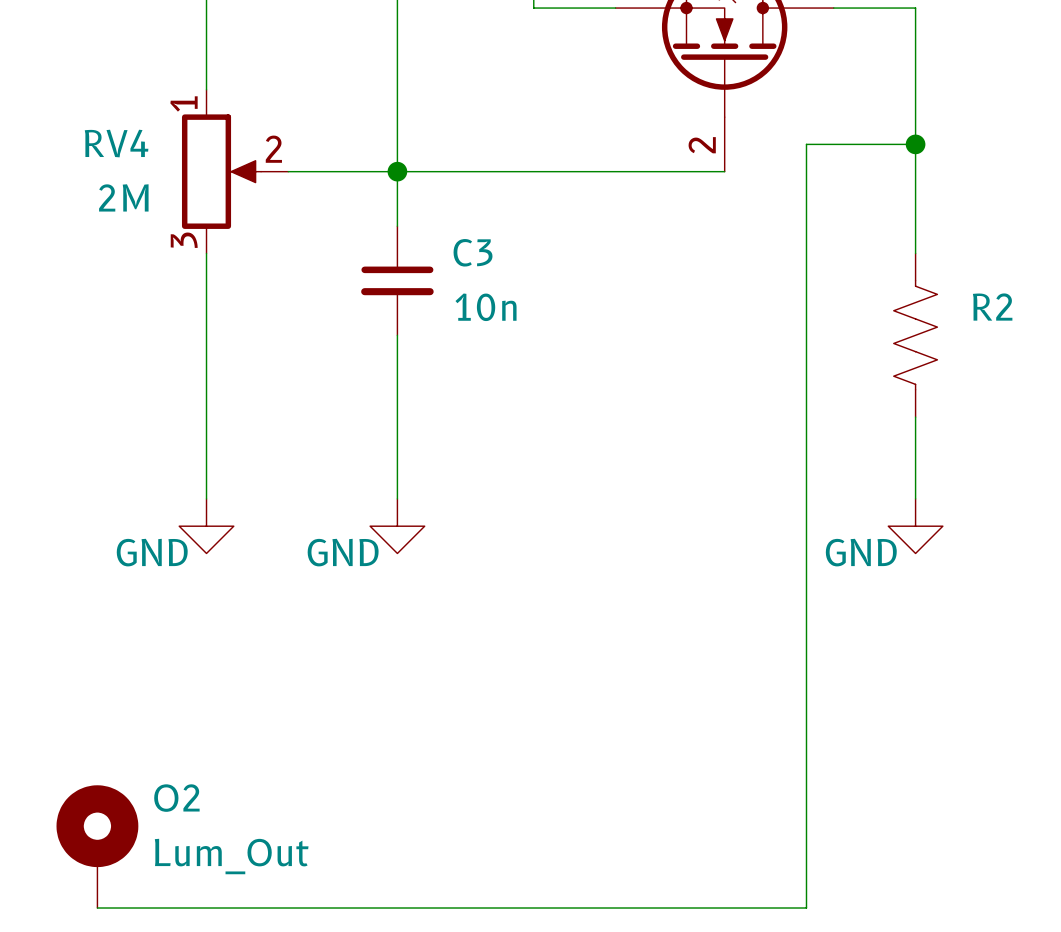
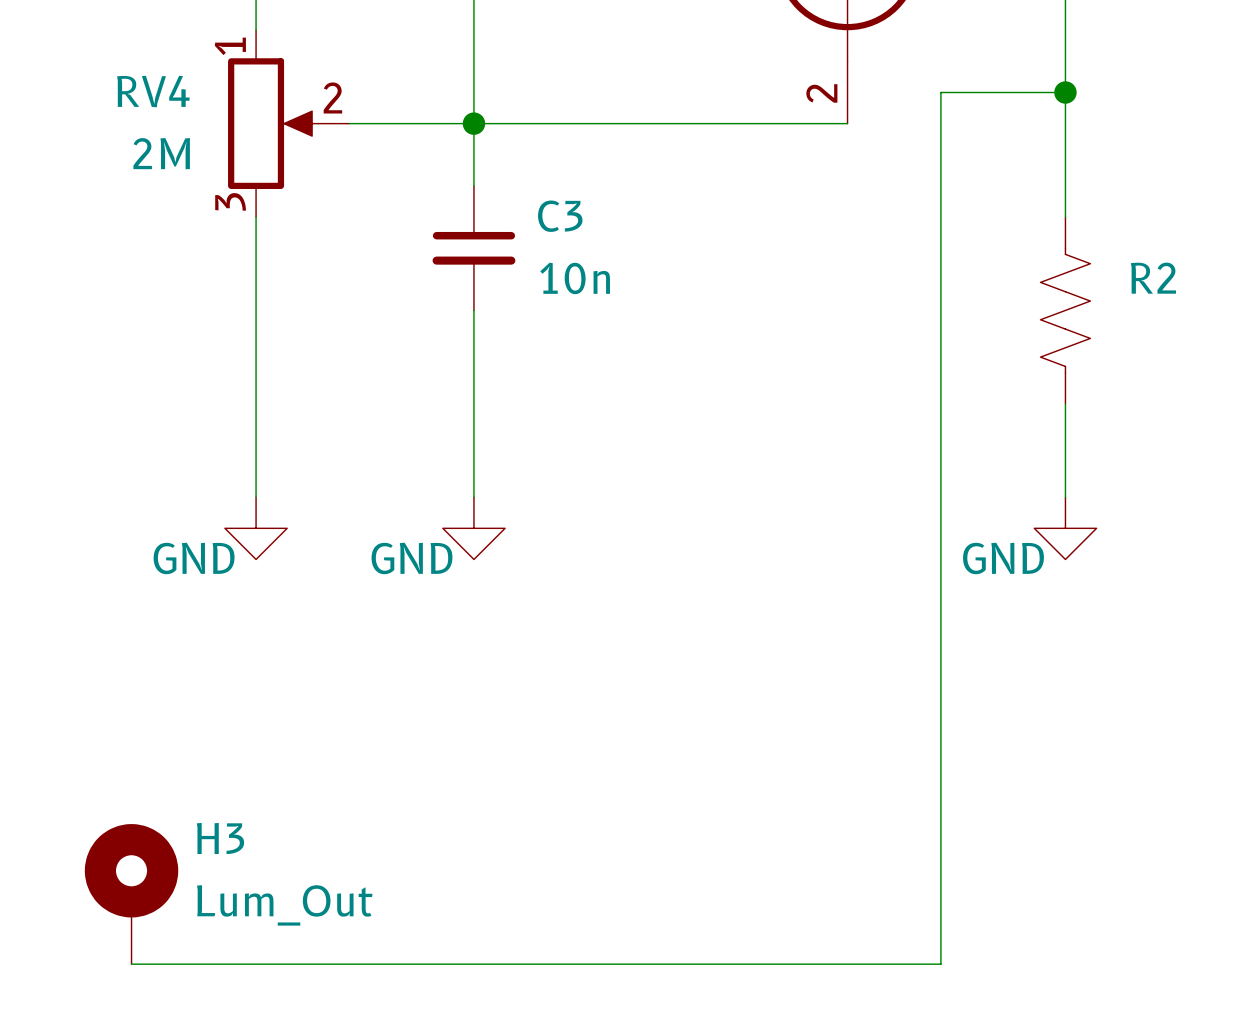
O2 name: O2 (176, 798) -> H3 (220, 838)

